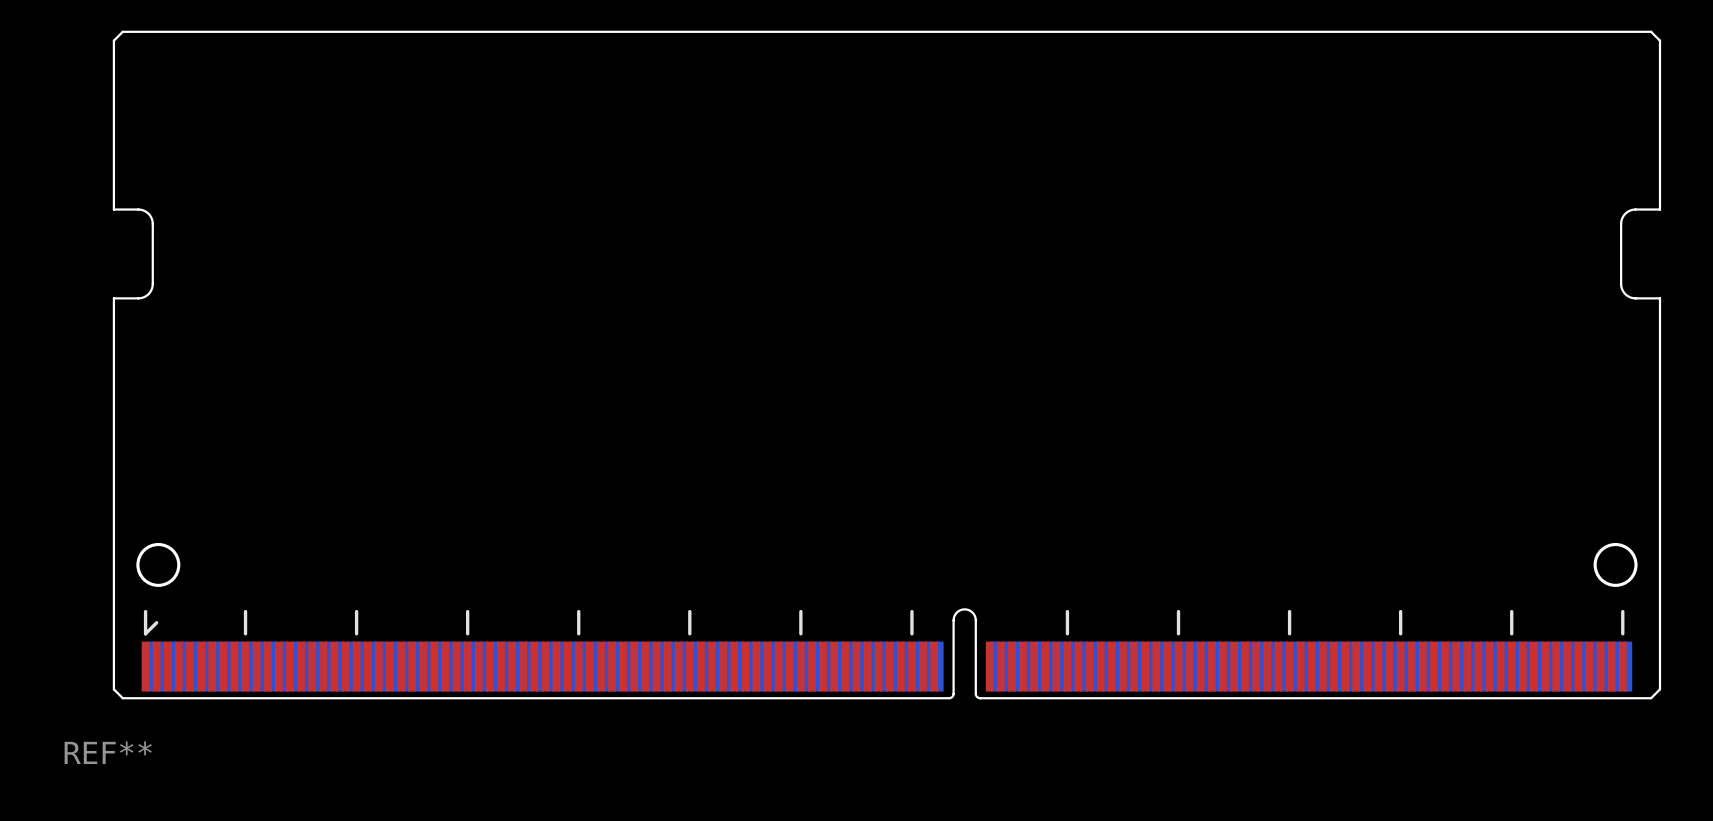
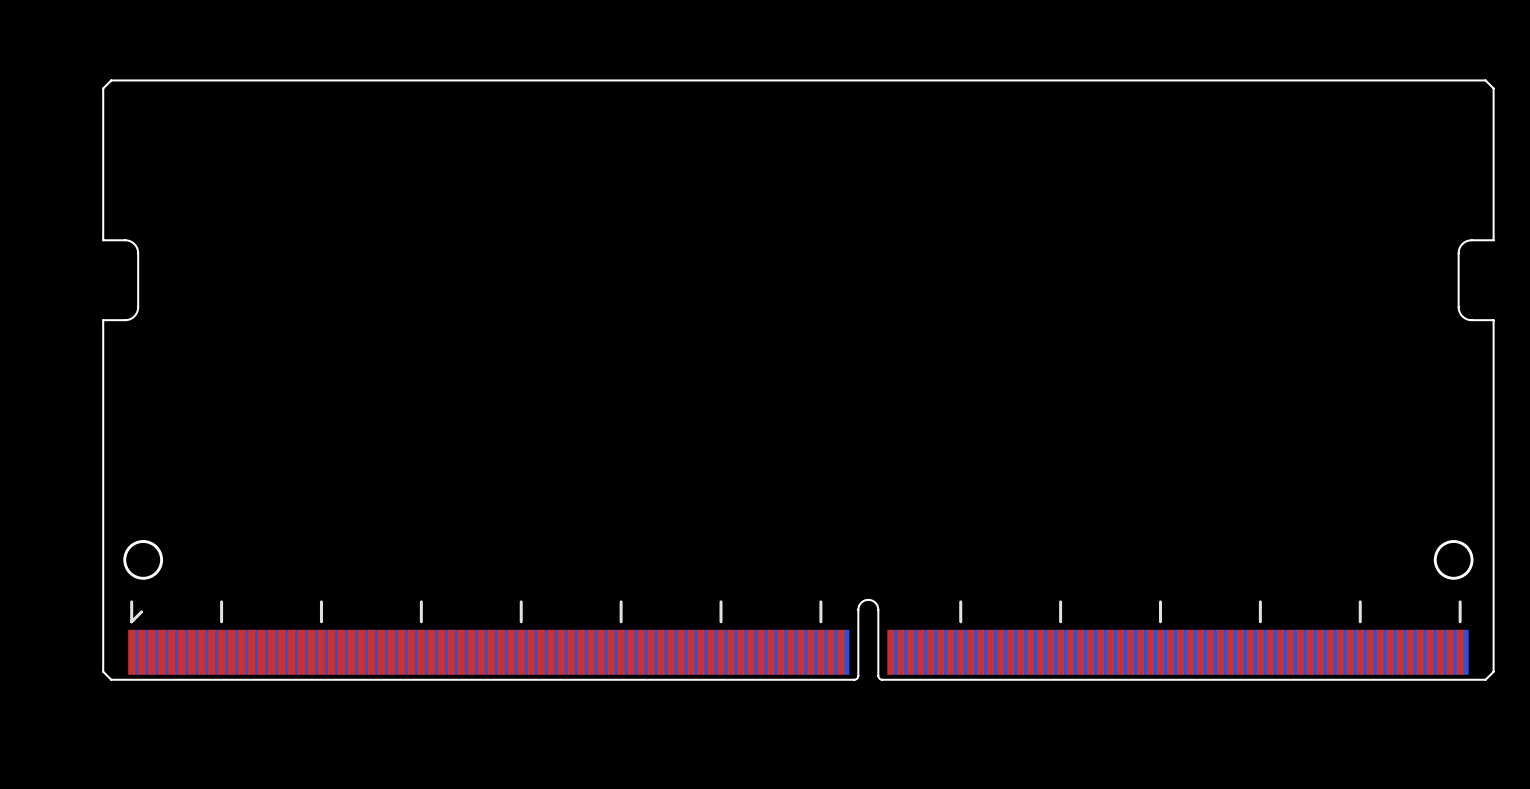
REF**: (886, 617) -> none
part: none -> (798, 607)

